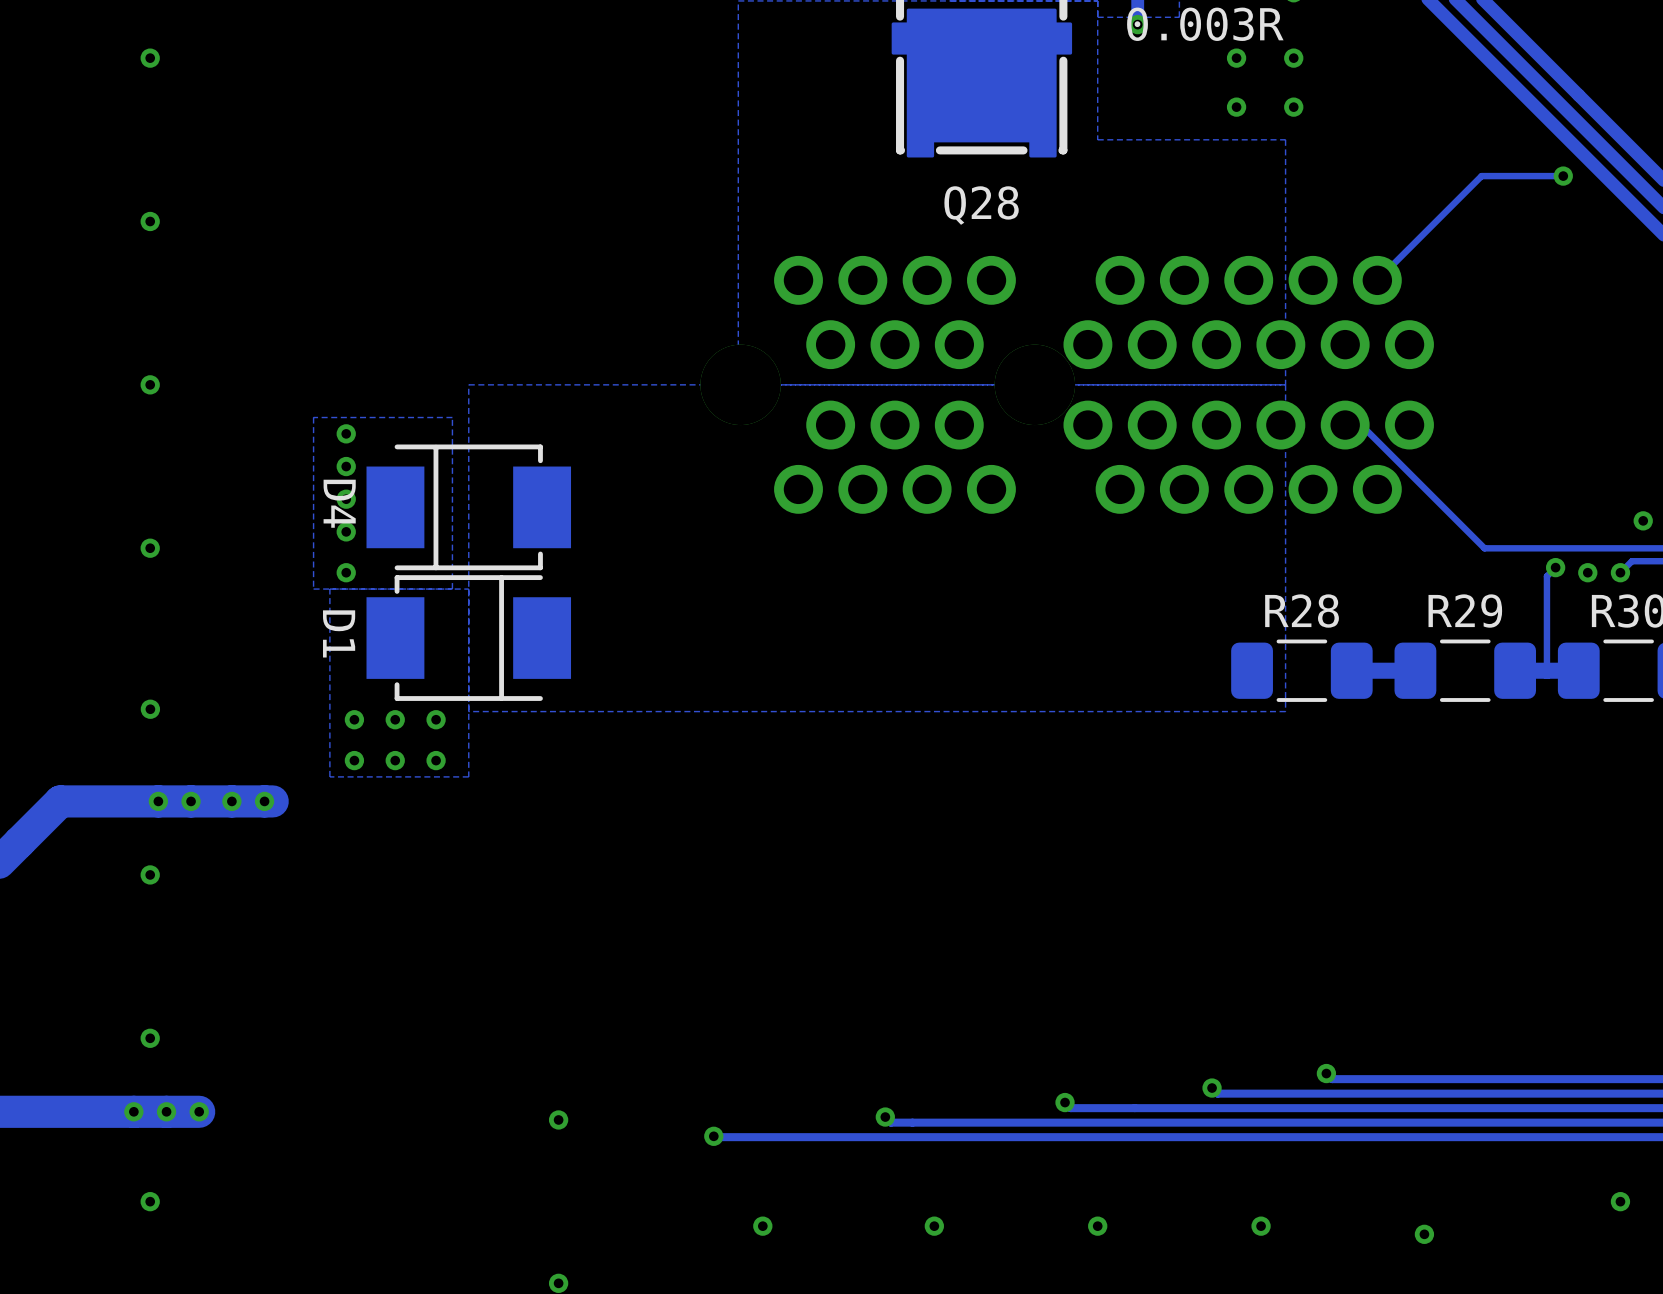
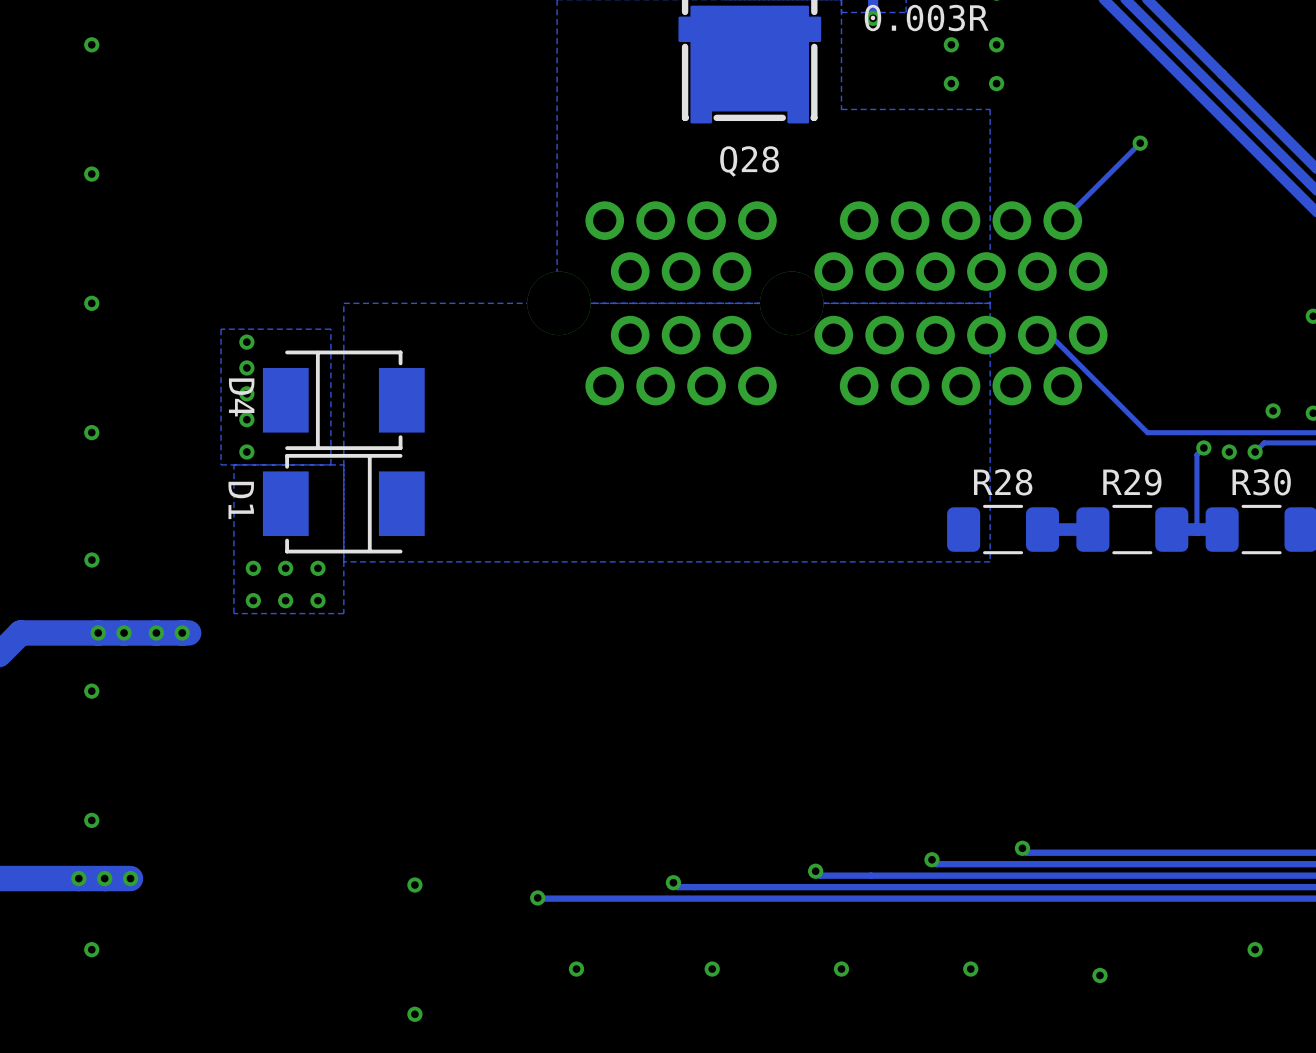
track: (1563, 176) (1481, 176) (1475, 182) -> none
via position: (1563, 176) -> (1140, 143)

